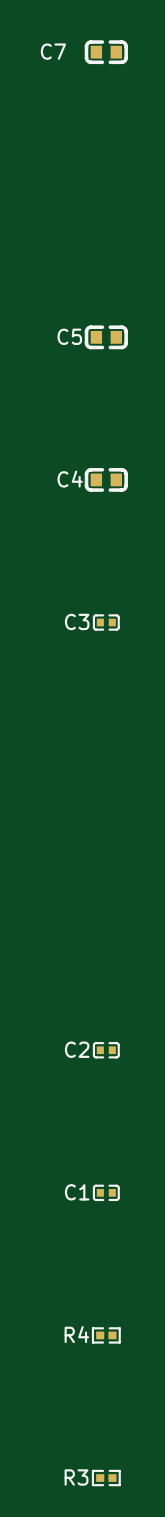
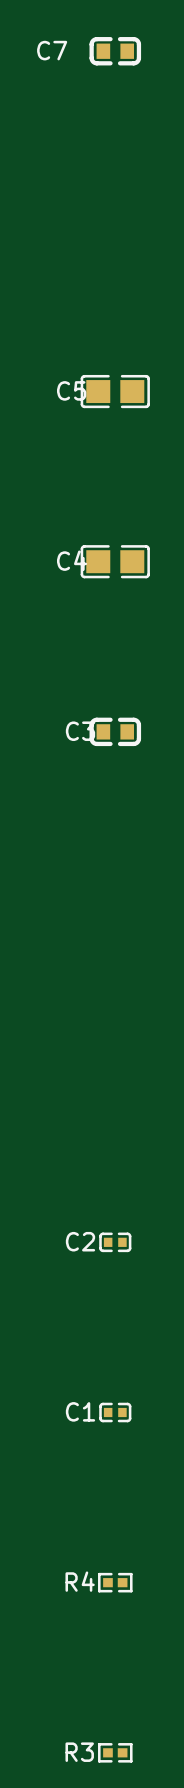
C5 footprint: [84, 325, 128, 350] -> [80, 374, 150, 409]
C4 footprint: [84, 468, 128, 492] -> [80, 545, 150, 579]
C3 footprint: [92, 614, 120, 631] -> [89, 717, 142, 747]

